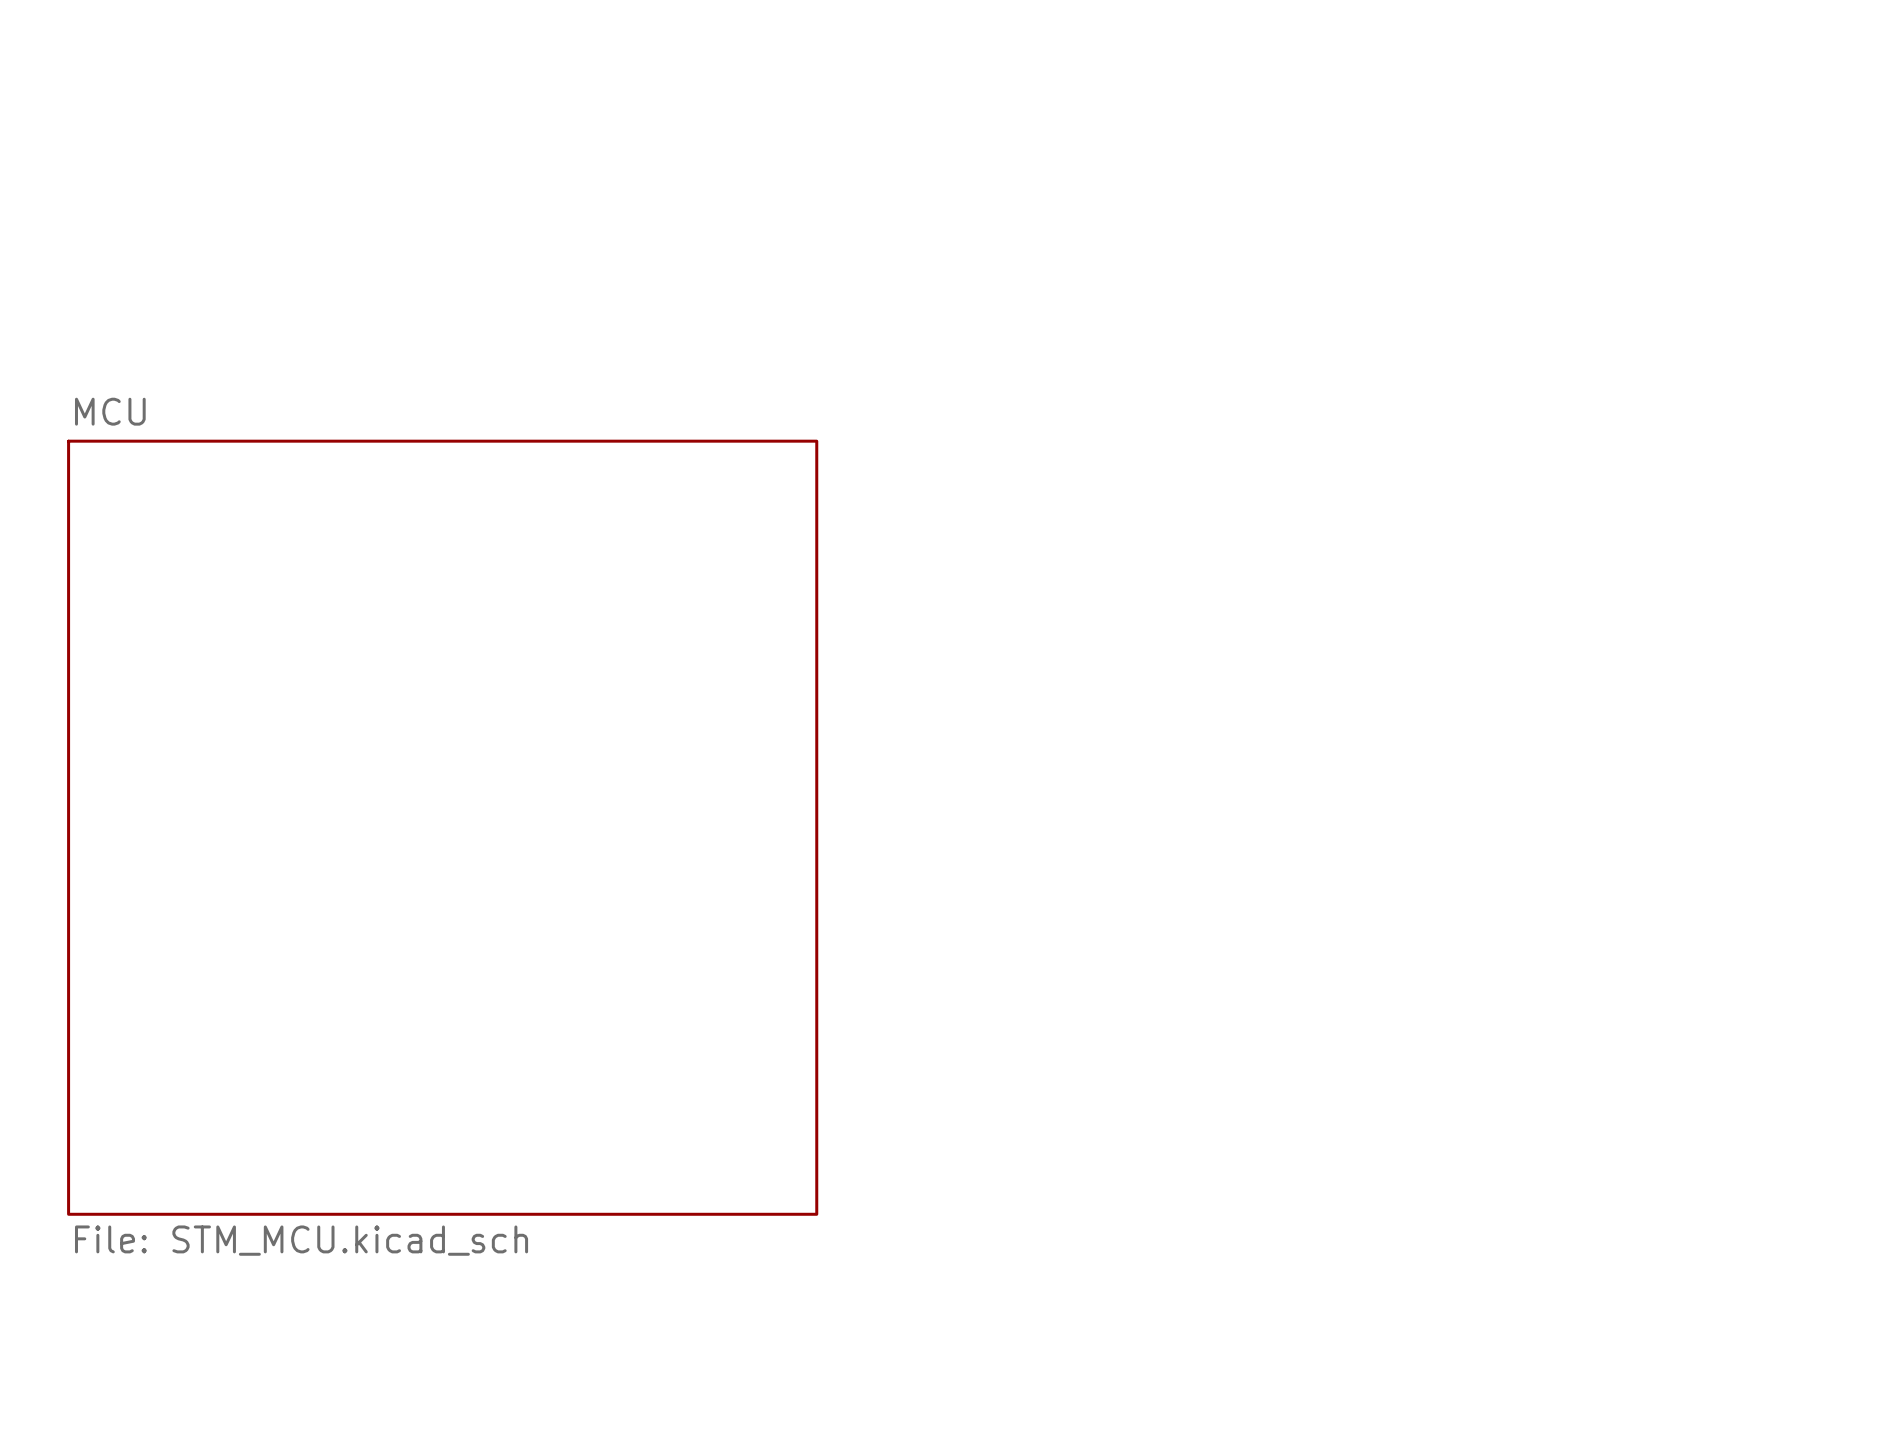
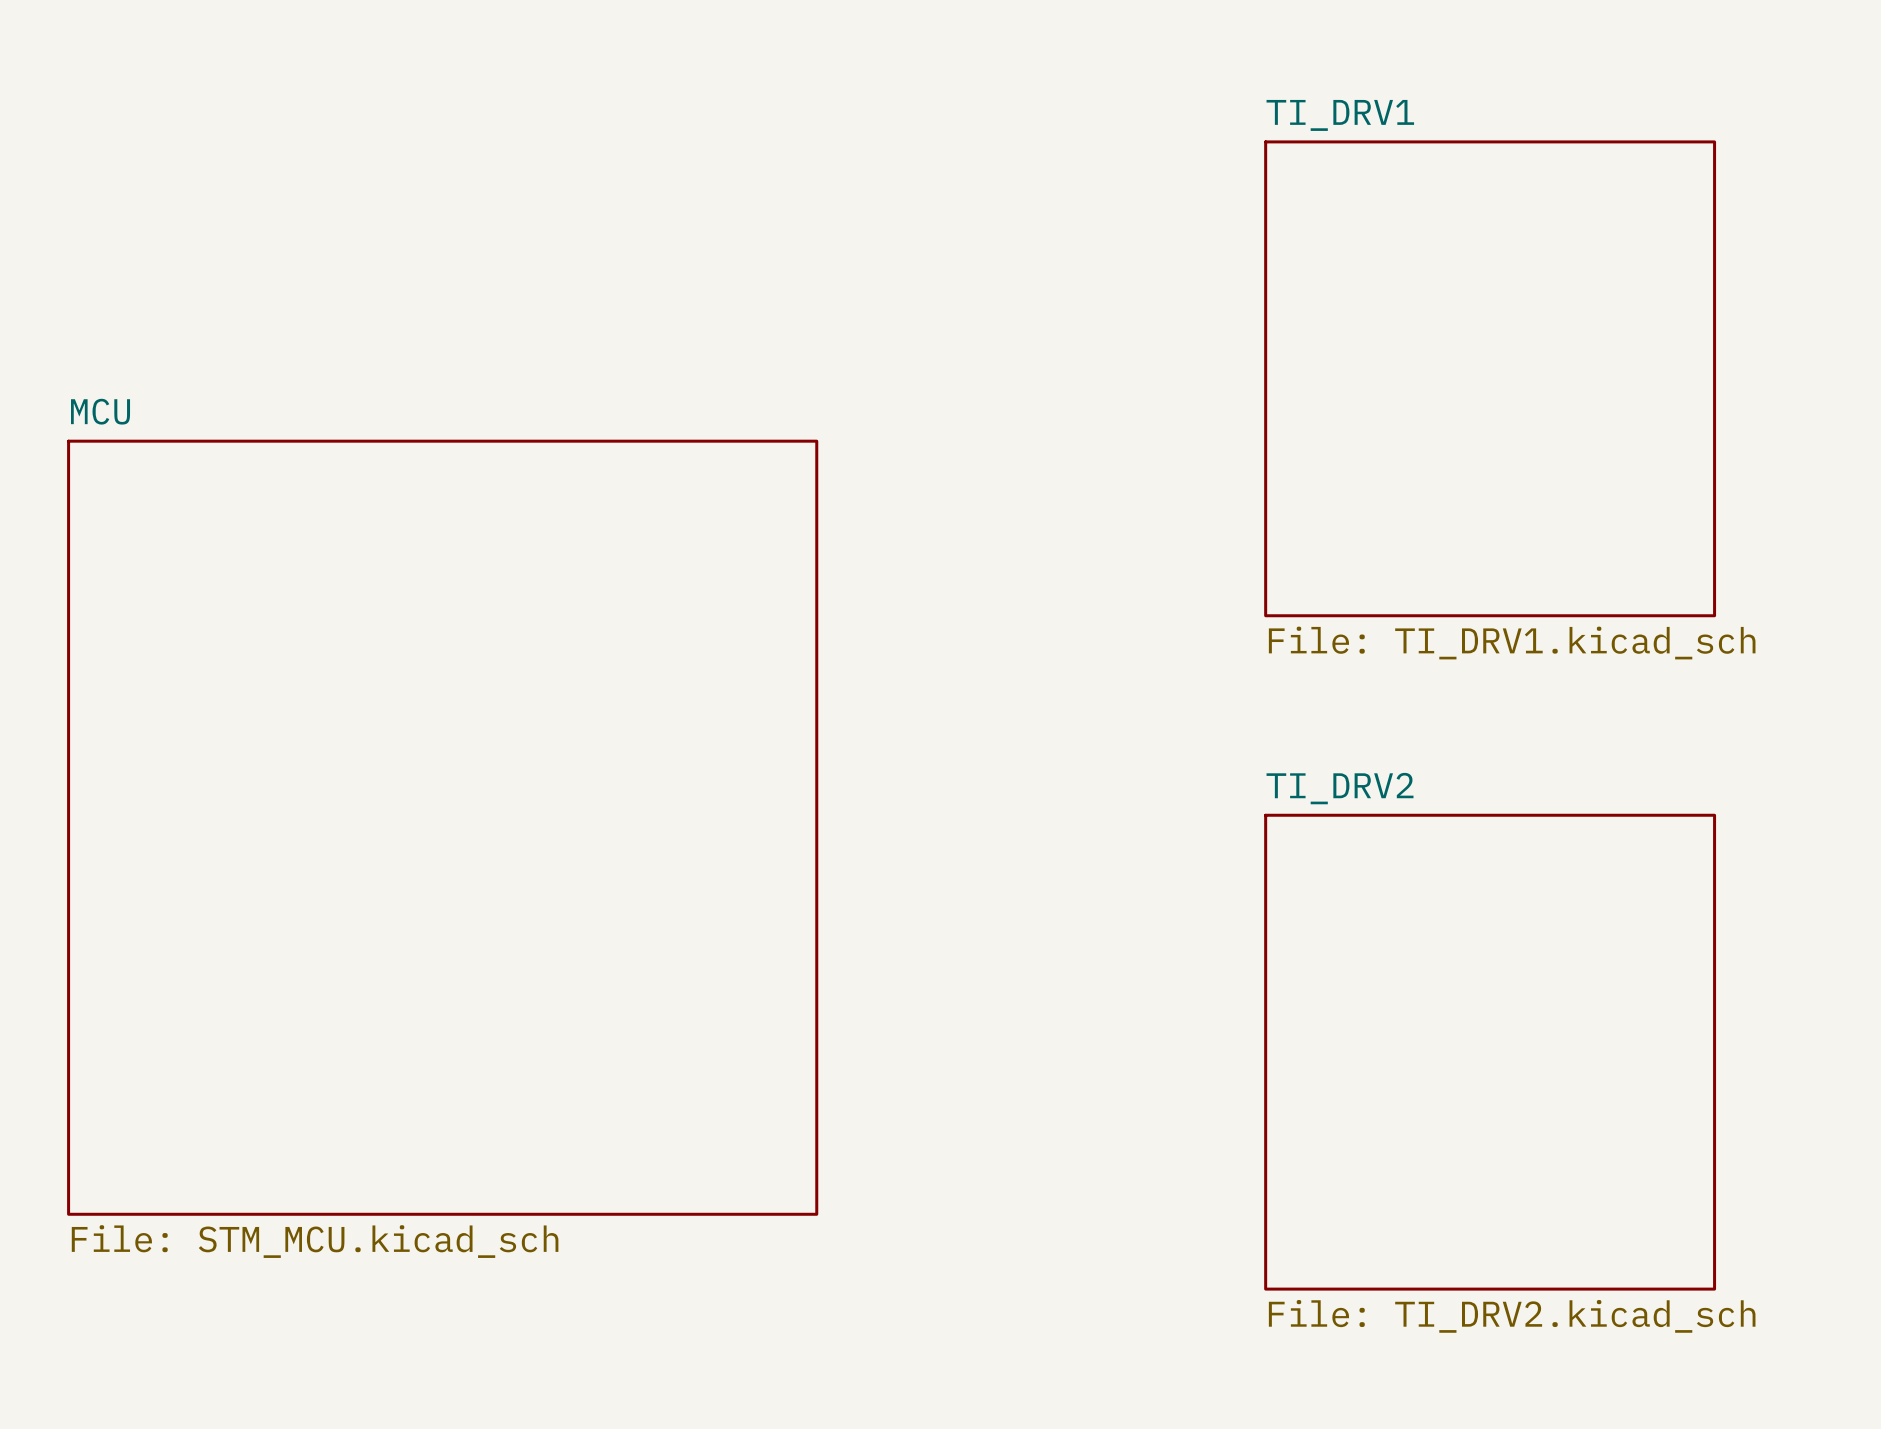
sheet TI_DRV1: none -> File: TI_DRV1.kicad_sch (1490, 378)
sheet TI_DRV2: none -> File: TI_DRV2.kicad_sch (1490, 1052)

